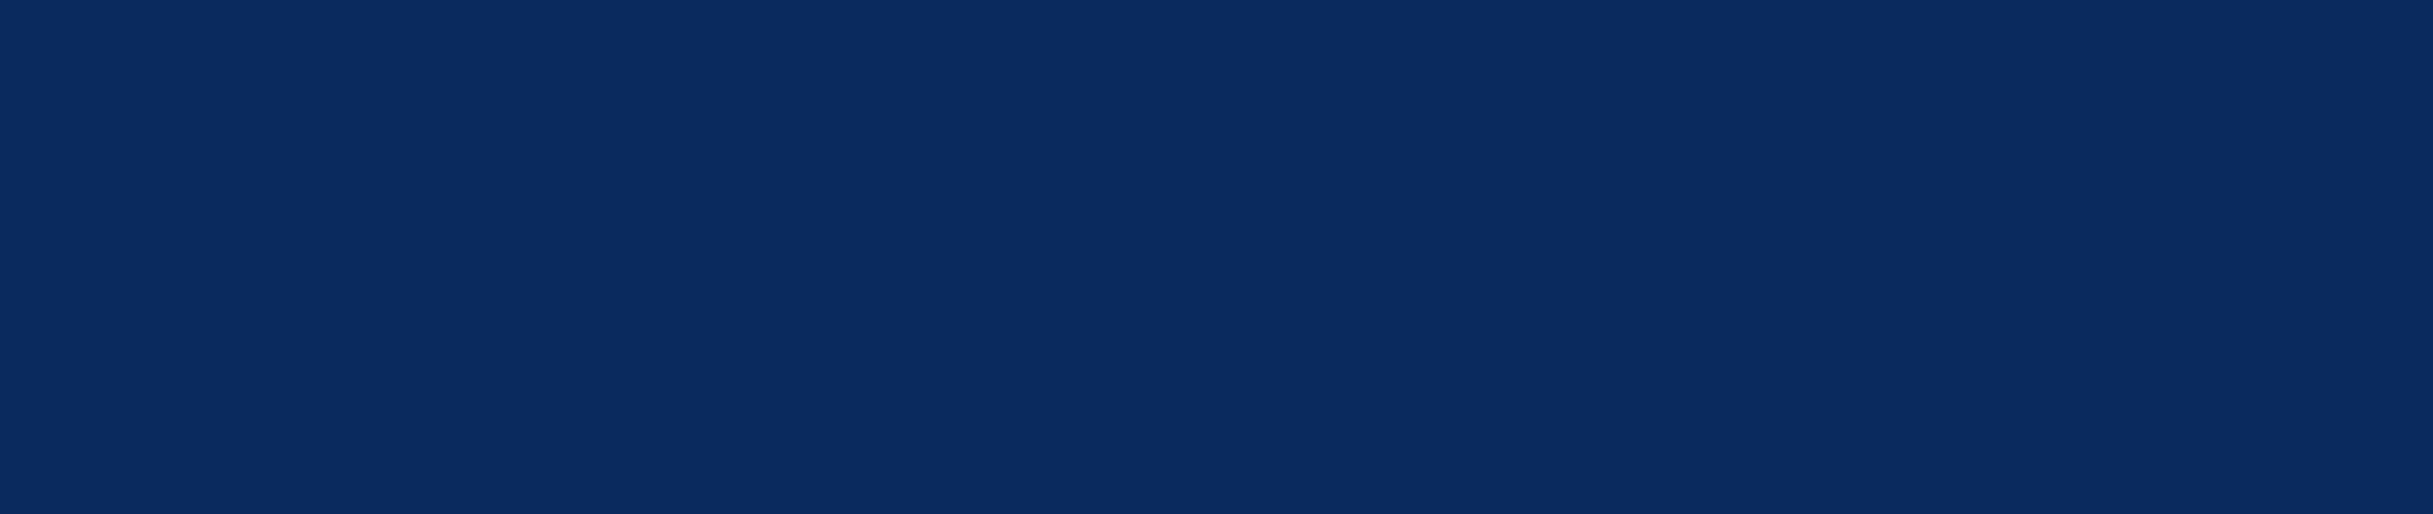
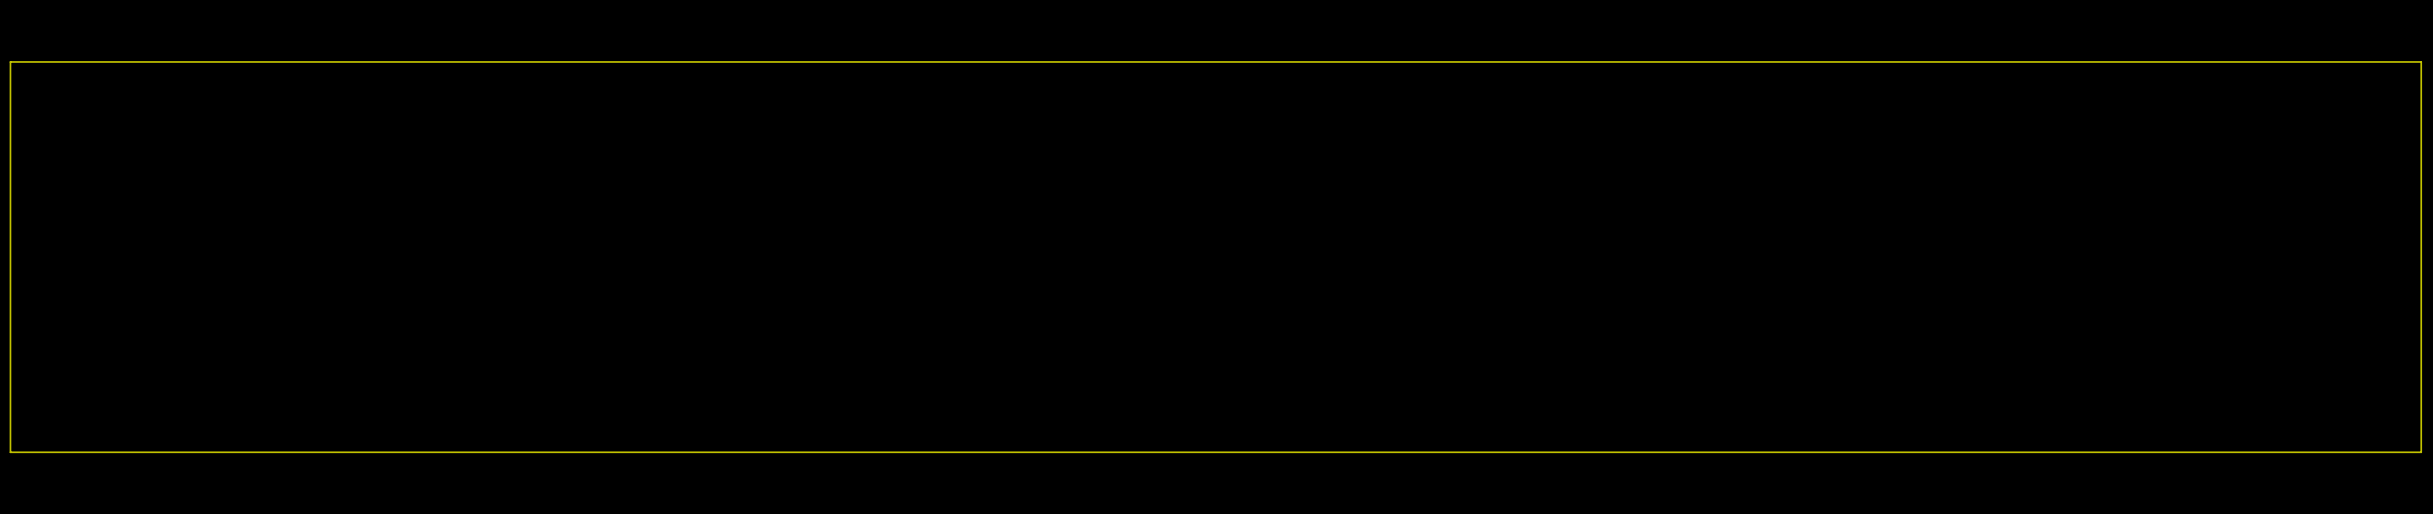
board edge: none -> (10, 61) (10, 452) (2421, 452) (2421, 61) (10, 61)

